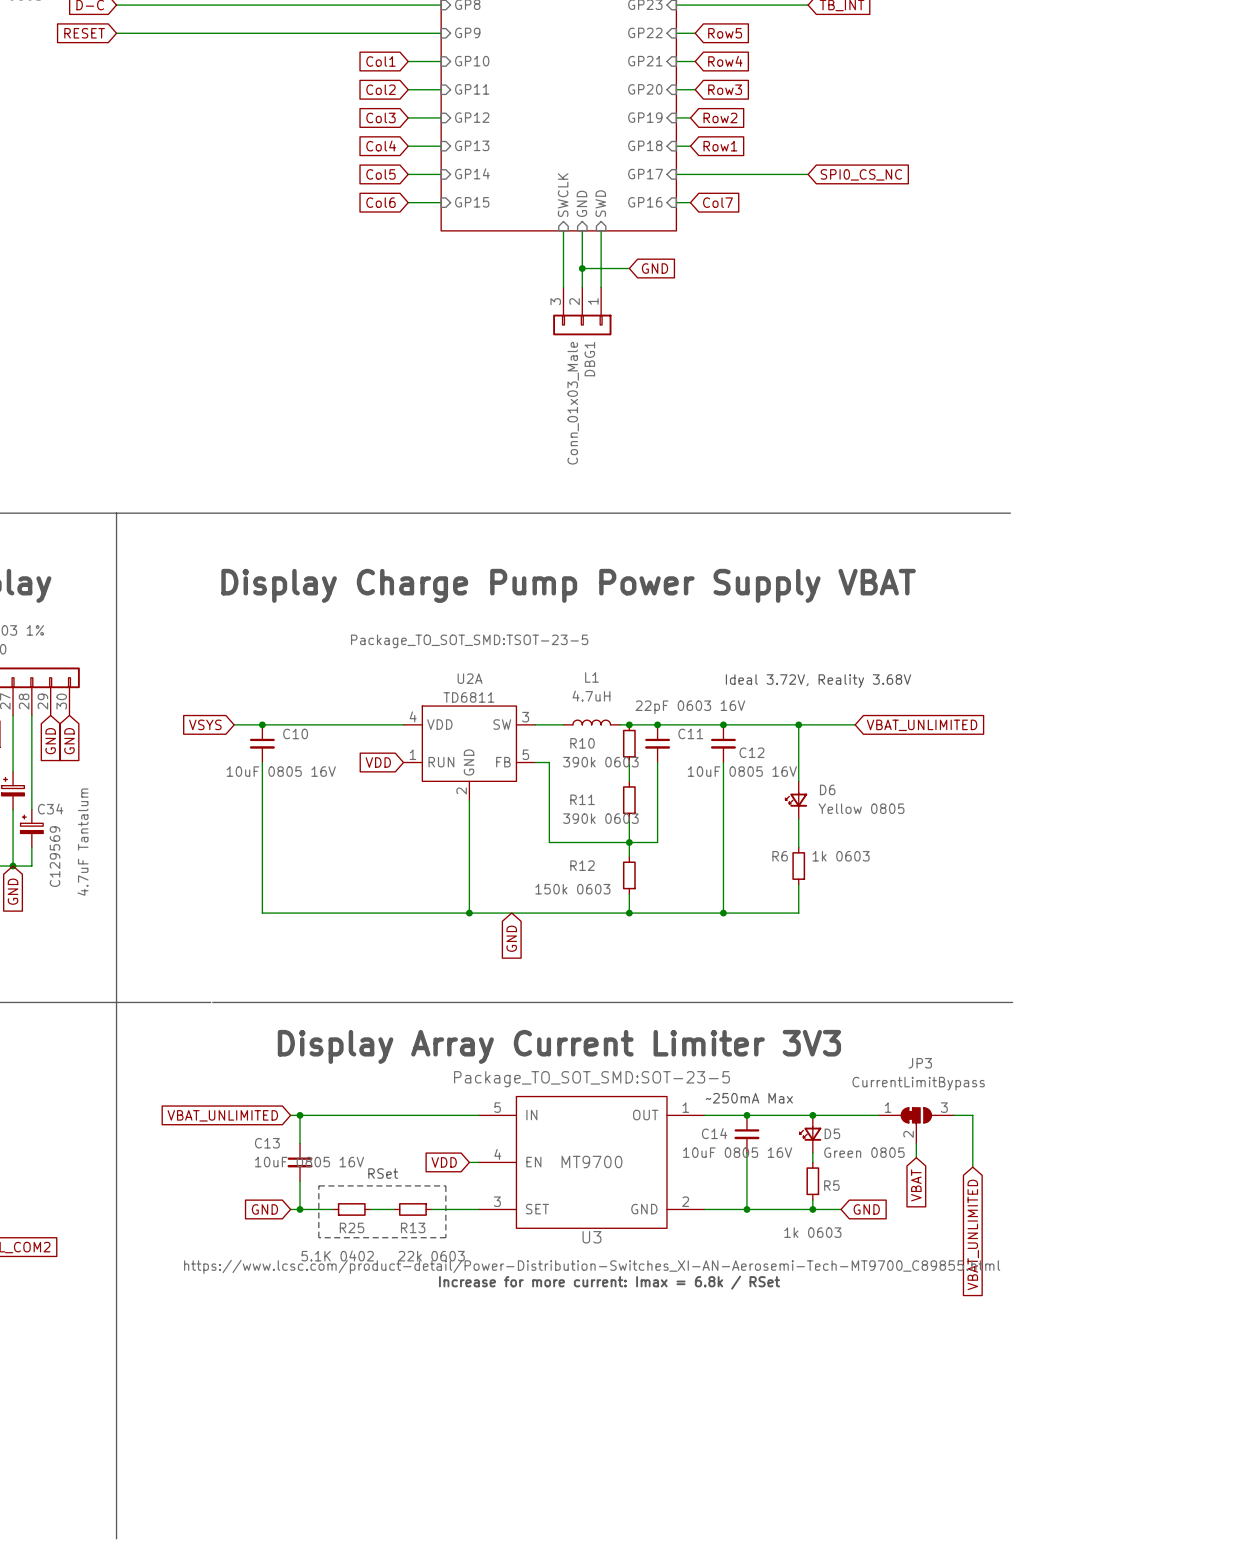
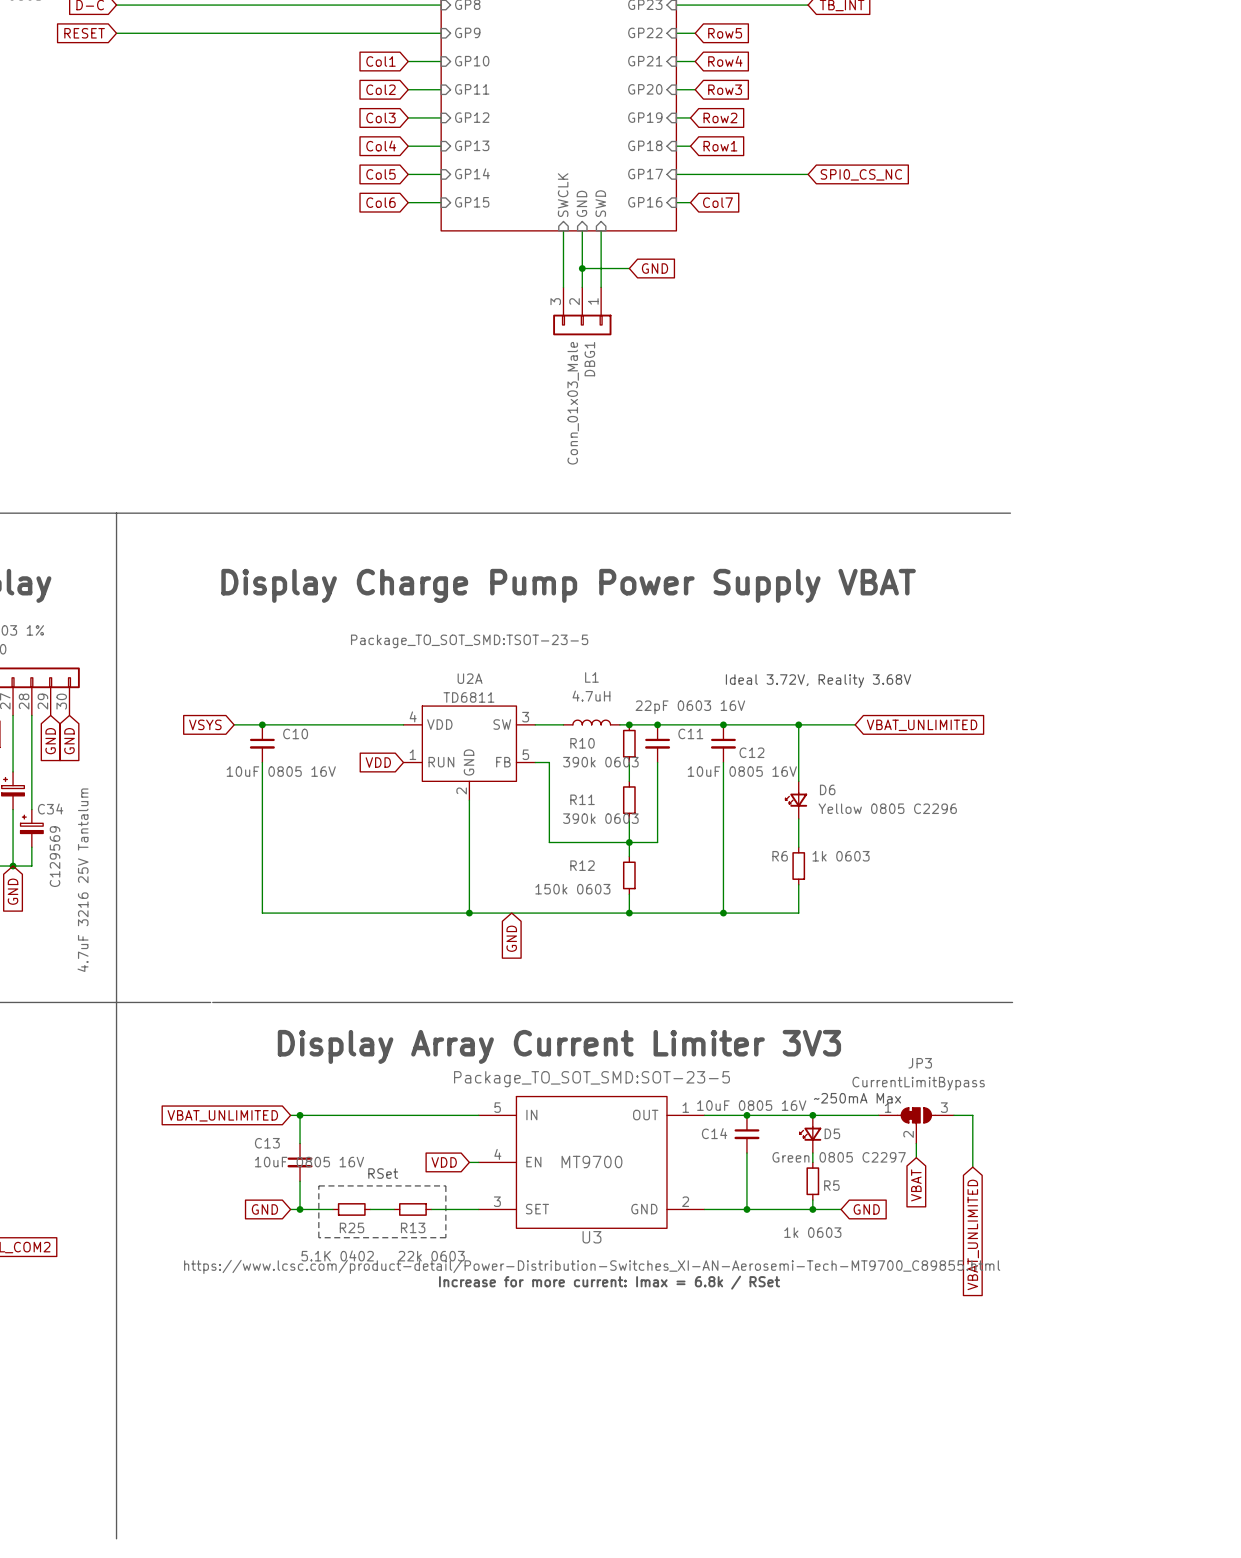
D6 value: Yellow 0805 (861, 808) -> Yellow 0805 C2296 (887, 808)
C34 value: 4.7uF Tantalum (83, 842) -> 4.7uF 3216 25V Tantalum (83, 880)
text position: ~250mA Max (749, 1098) -> ~250mA Max (857, 1098)
C14 value position: 10uF 0805 16V (737, 1152) -> 10uF 0805 16V (751, 1105)
D5 value: Green 0805 (864, 1152) -> Green 0805 C2297 (839, 1157)

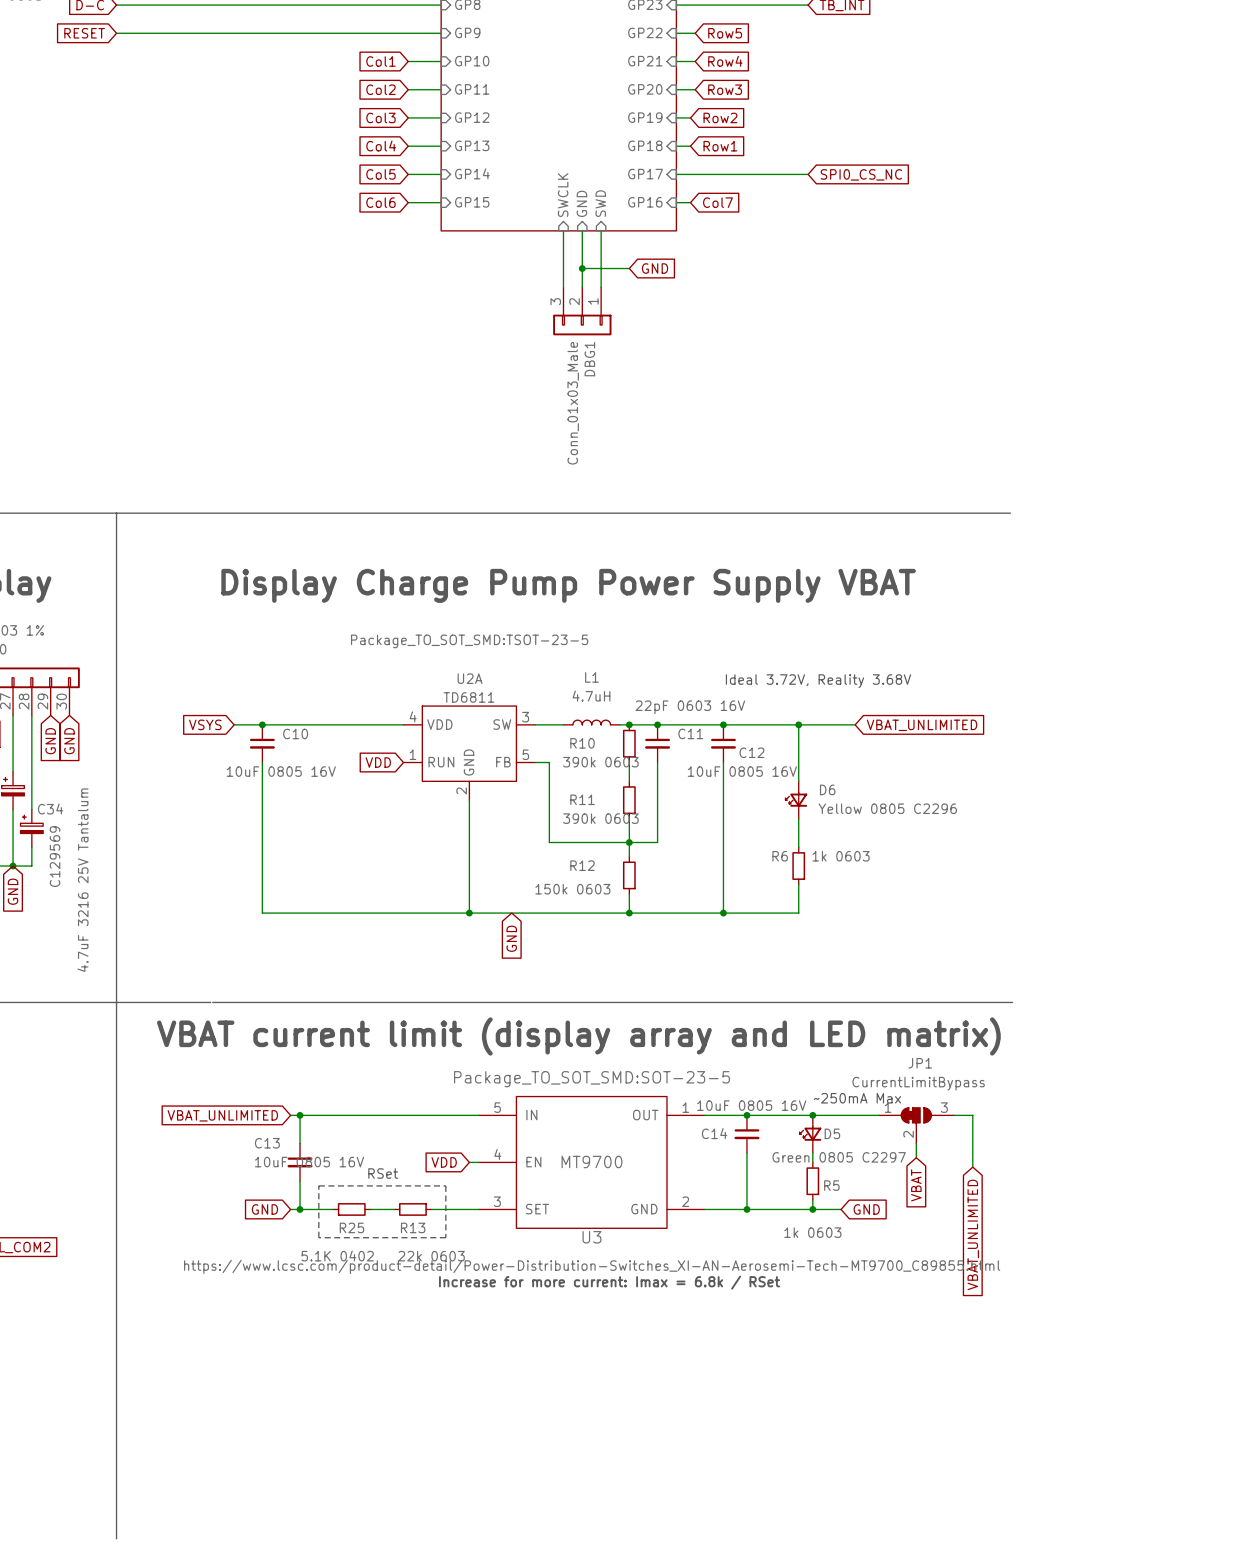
text: none -> VBAT current limit (display array and LED matrix) (578, 1036)
text: Display Array Current Limiter 3V3 (559, 1046) -> none
JP3: CurrentLimitBypass (916, 1125) -> none
JP1: none -> CurrentLimitBypass (916, 1125)

